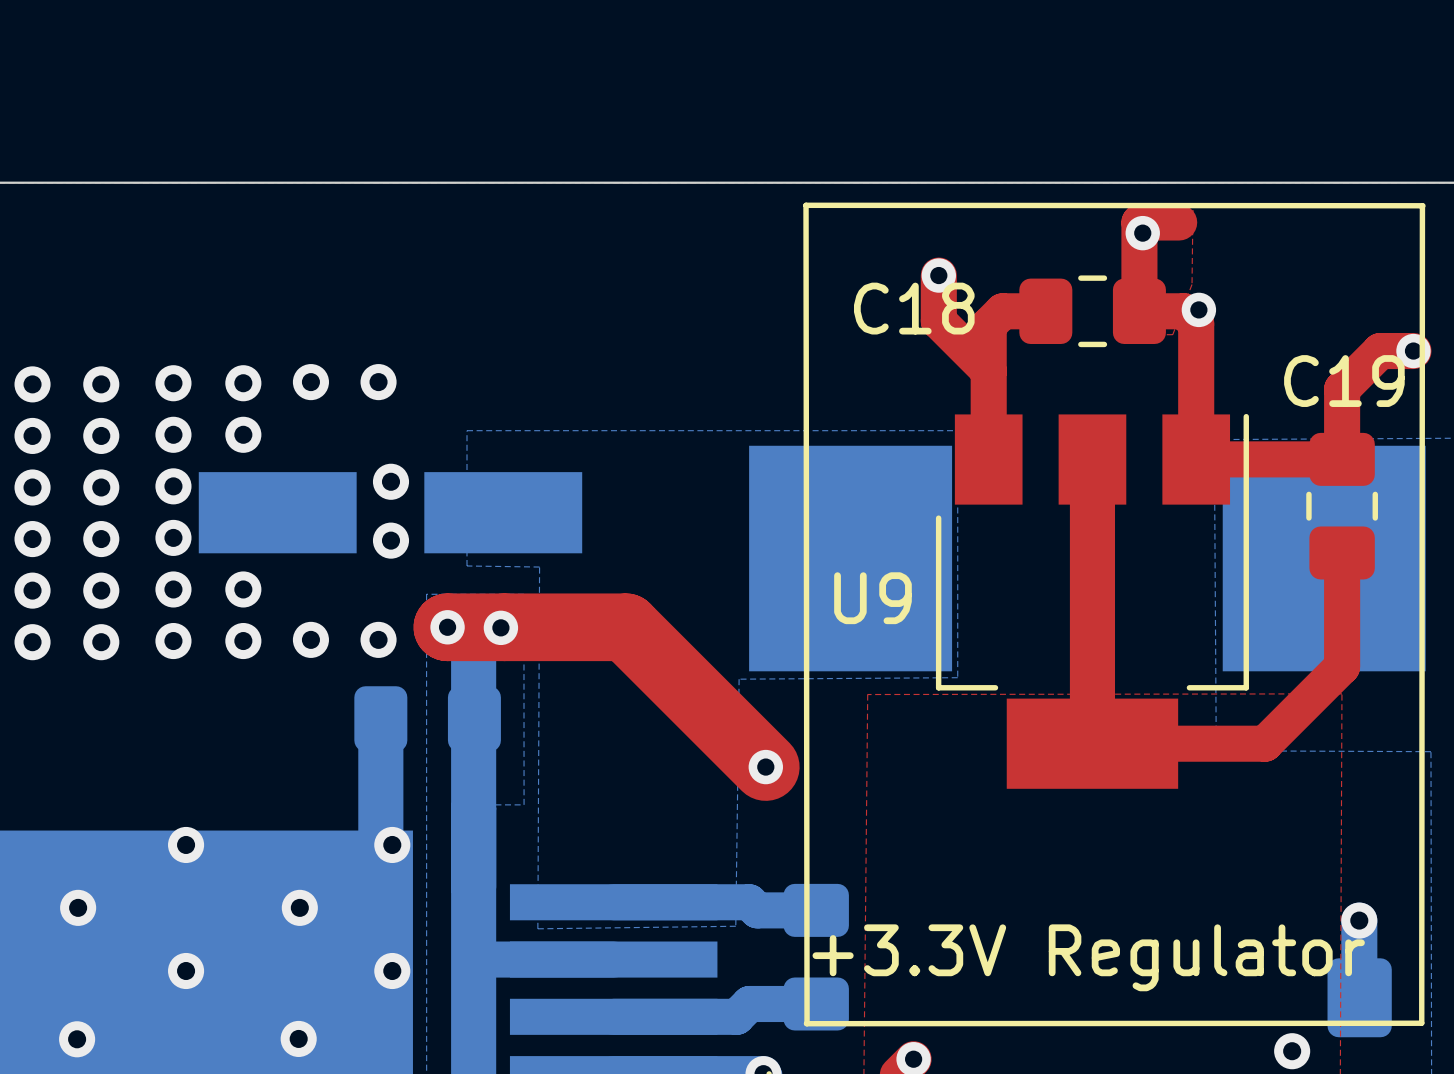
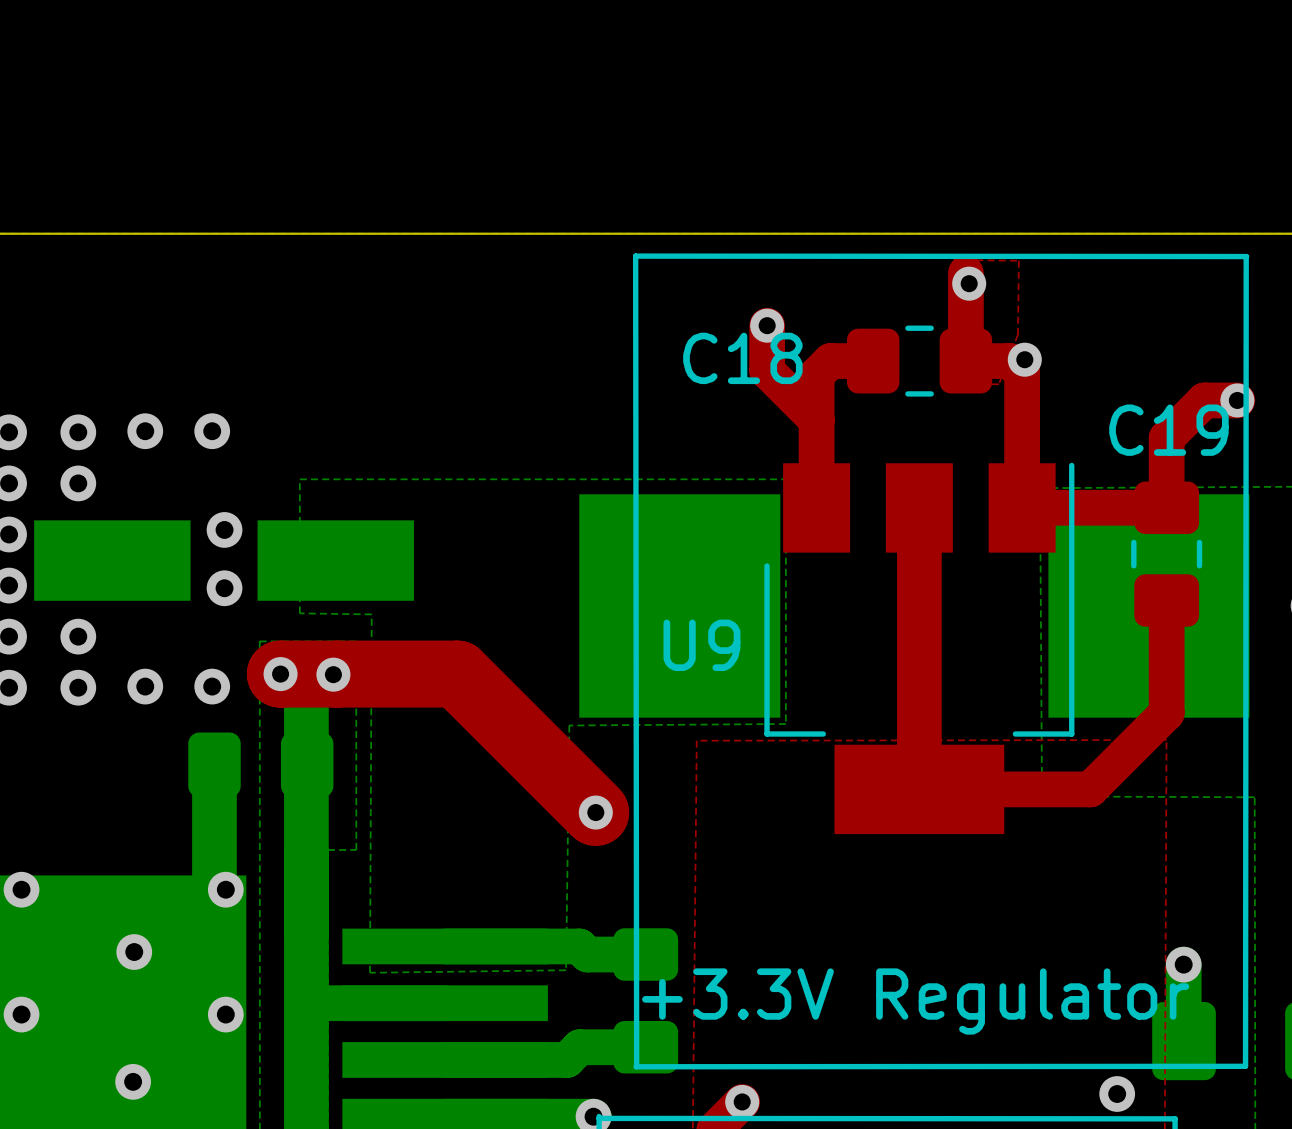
top track: (1139, 222) (1179, 222) -> none

